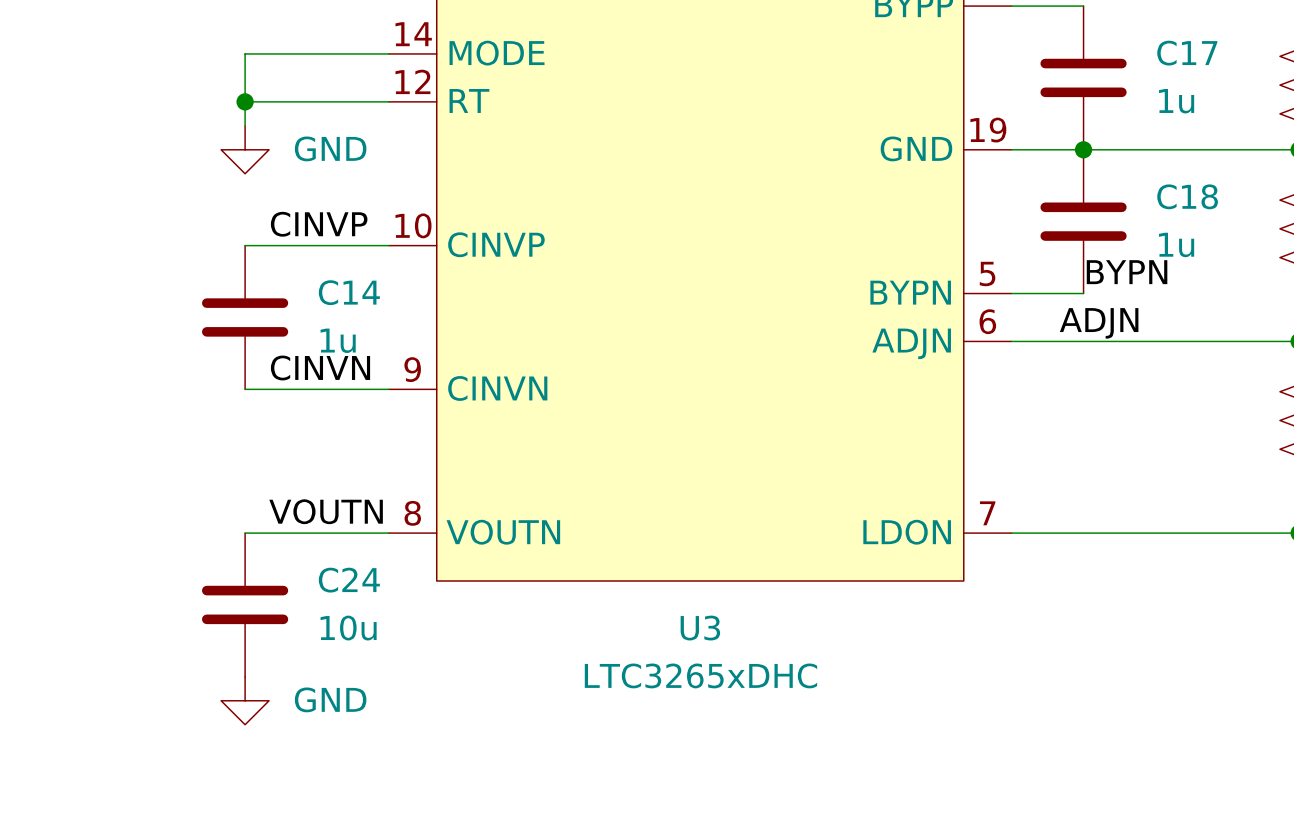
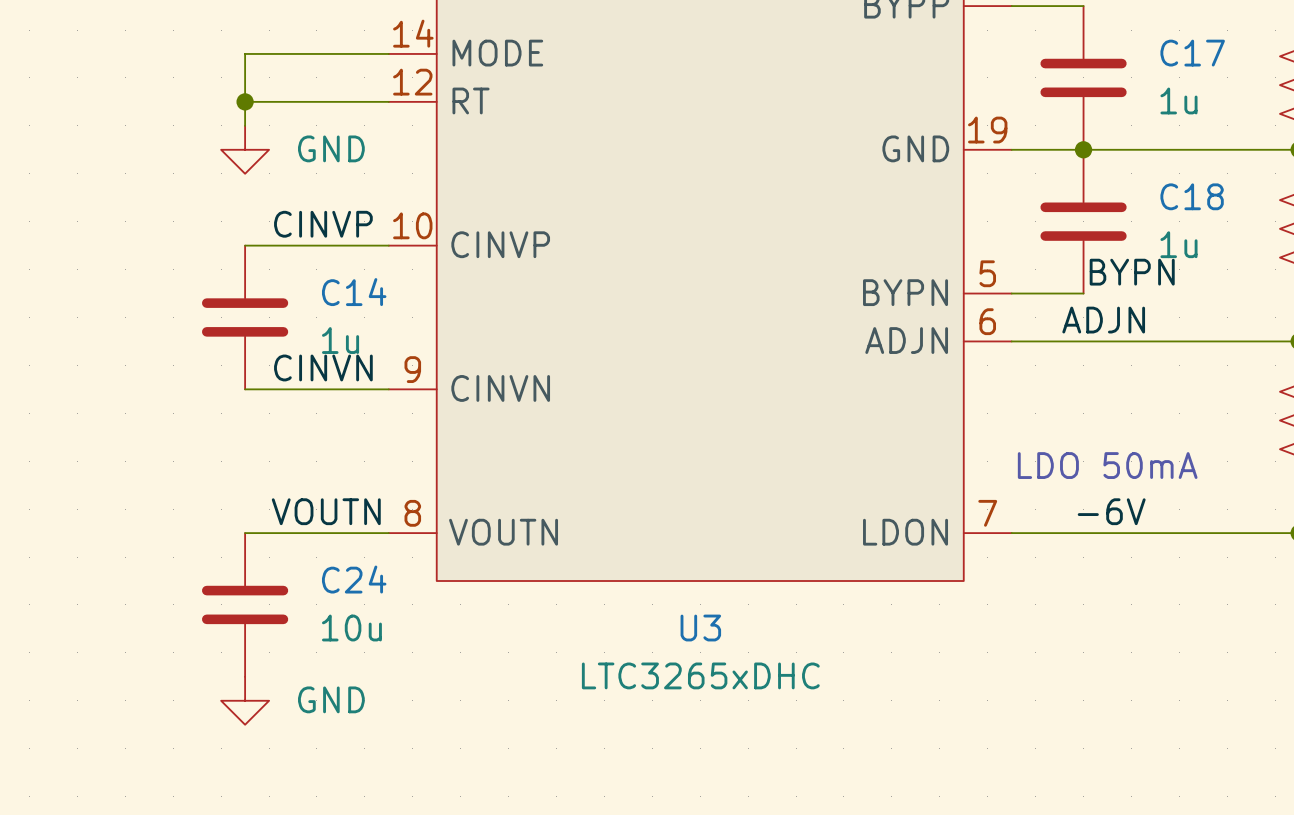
text: none -> LDO 50mA (1107, 465)
label: none -> -6V (1111, 511)

